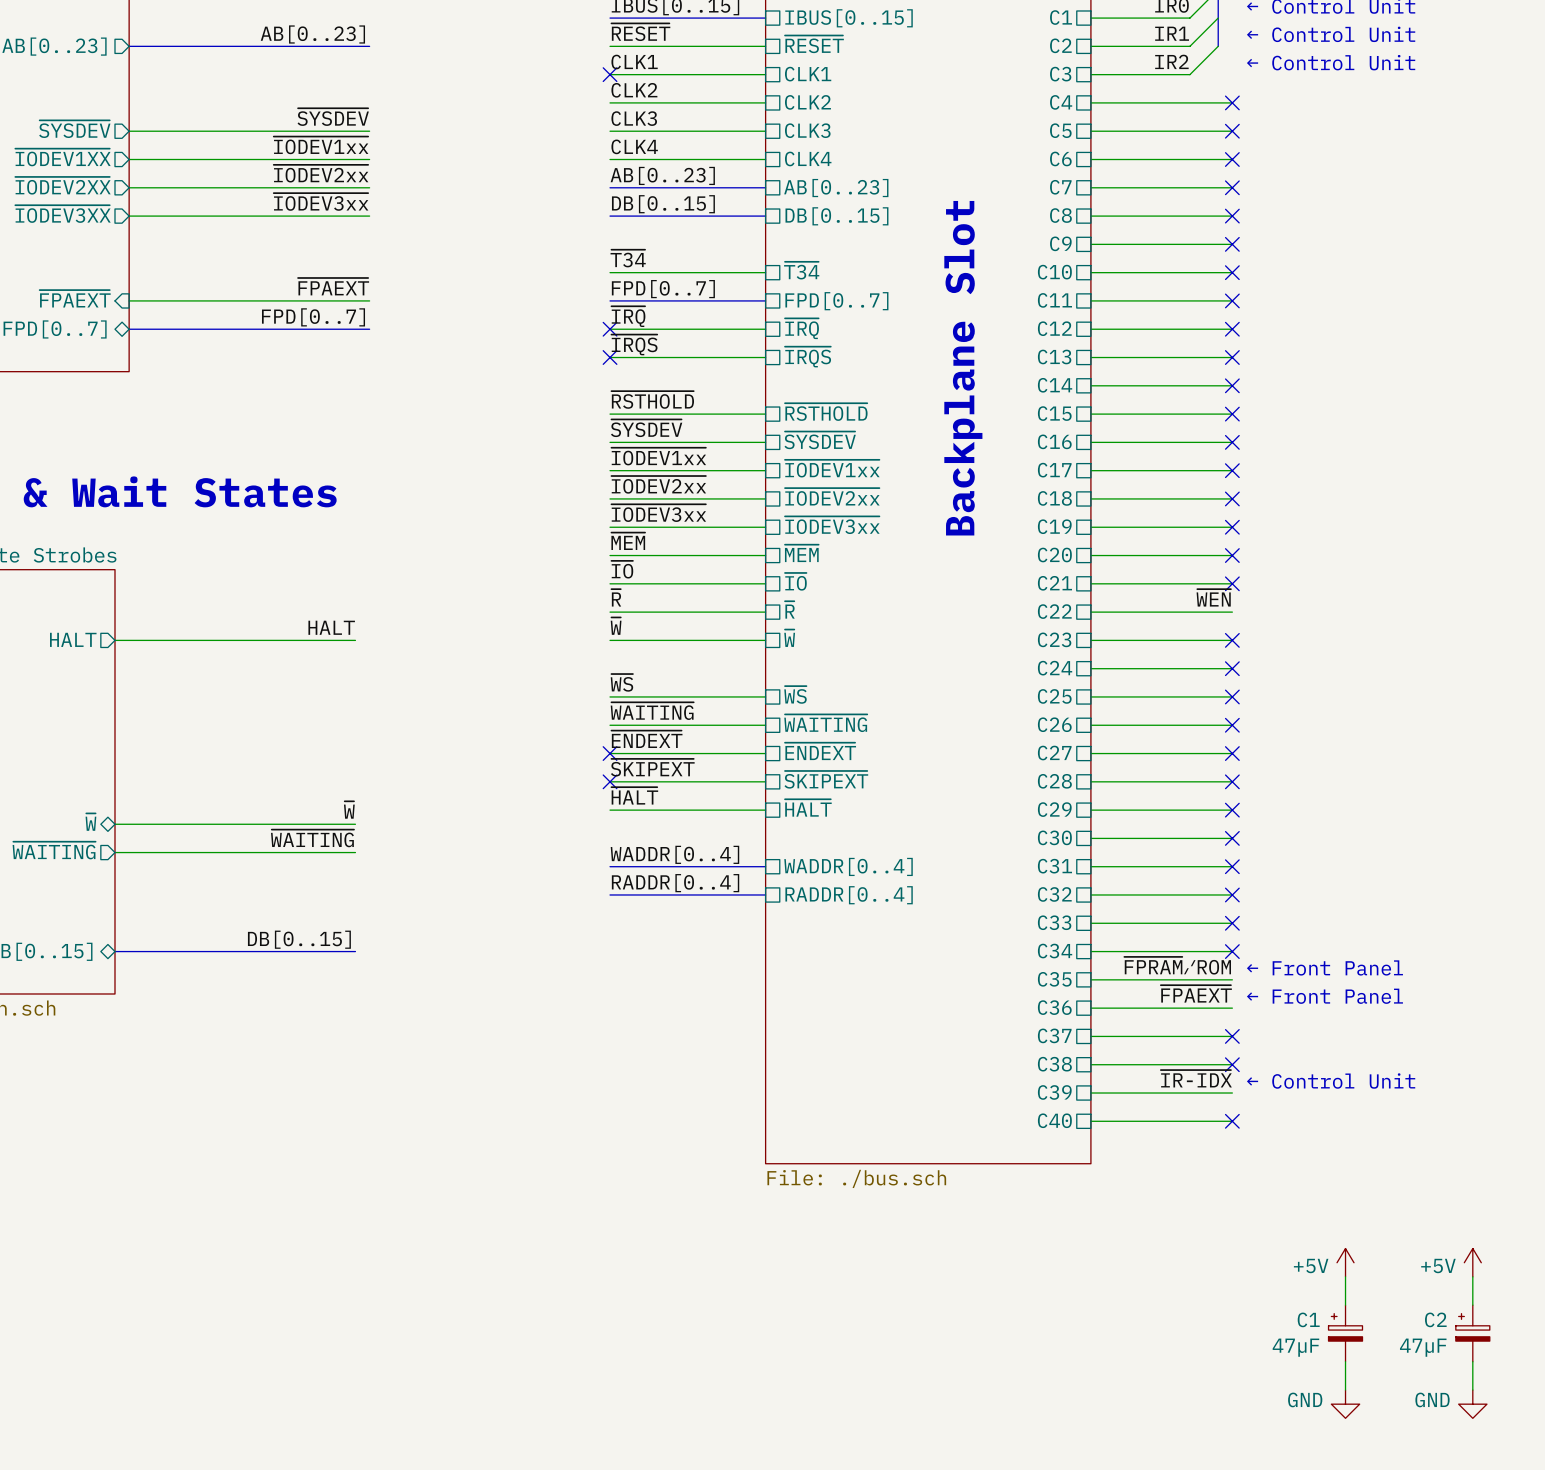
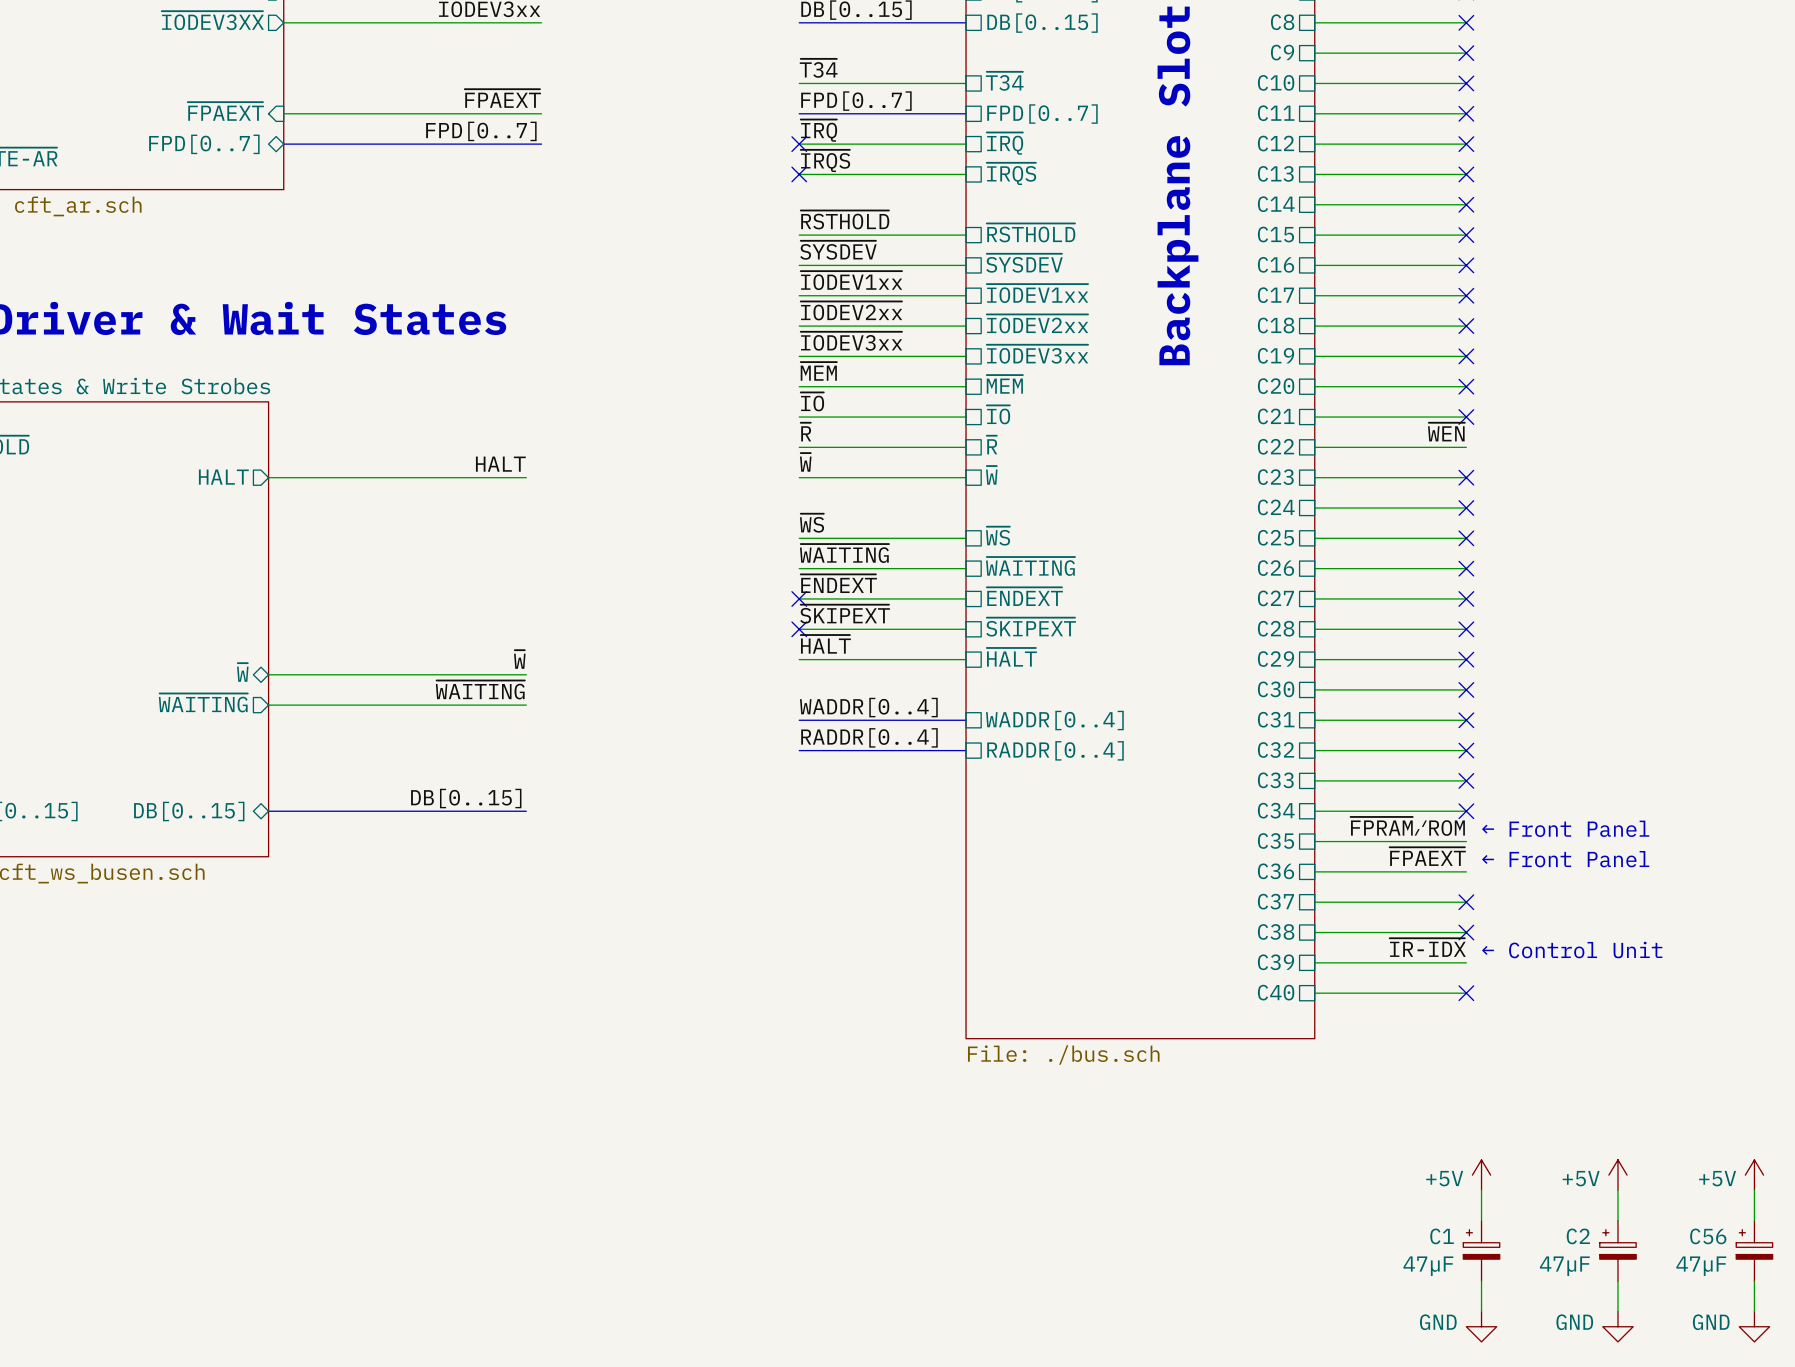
power symbol position: +5V (1345, 1262) -> +5V (1617, 1175)
power symbol position: +5V (1472, 1262) -> +5V (1754, 1175)
wire: (1345, 1276) (1345, 1305) -> (1617, 1190) (1617, 1220)
wire: (1472, 1276) (1472, 1305) -> (1754, 1190) (1754, 1220)
power symbol: none -> +5V (1481, 1175)
wire: none -> (1481, 1190) (1481, 1220)
C1 position: (1345, 1333) -> (1481, 1250)
C2 position: (1472, 1333) -> (1617, 1250)
wire: (1345, 1361) (1345, 1390) -> (1617, 1281) (1617, 1311)
wire: (1472, 1361) (1472, 1390) -> (1754, 1281) (1754, 1311)
C56: none -> 47µF (1754, 1250)
wire: none -> (1481, 1281) (1481, 1311)
power symbol position: GND (1345, 1404) -> GND (1617, 1326)
power symbol position: GND (1472, 1404) -> GND (1754, 1326)
power symbol: none -> GND (1481, 1326)

